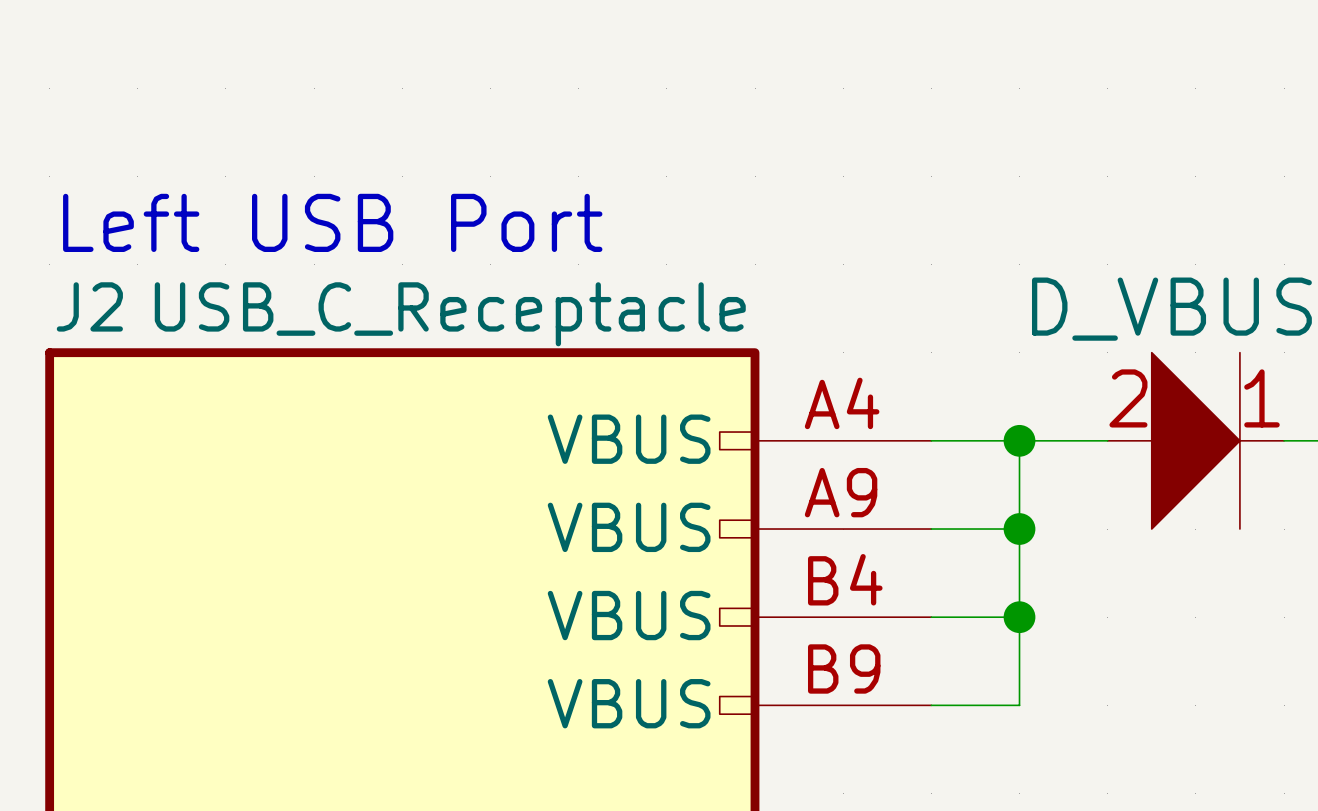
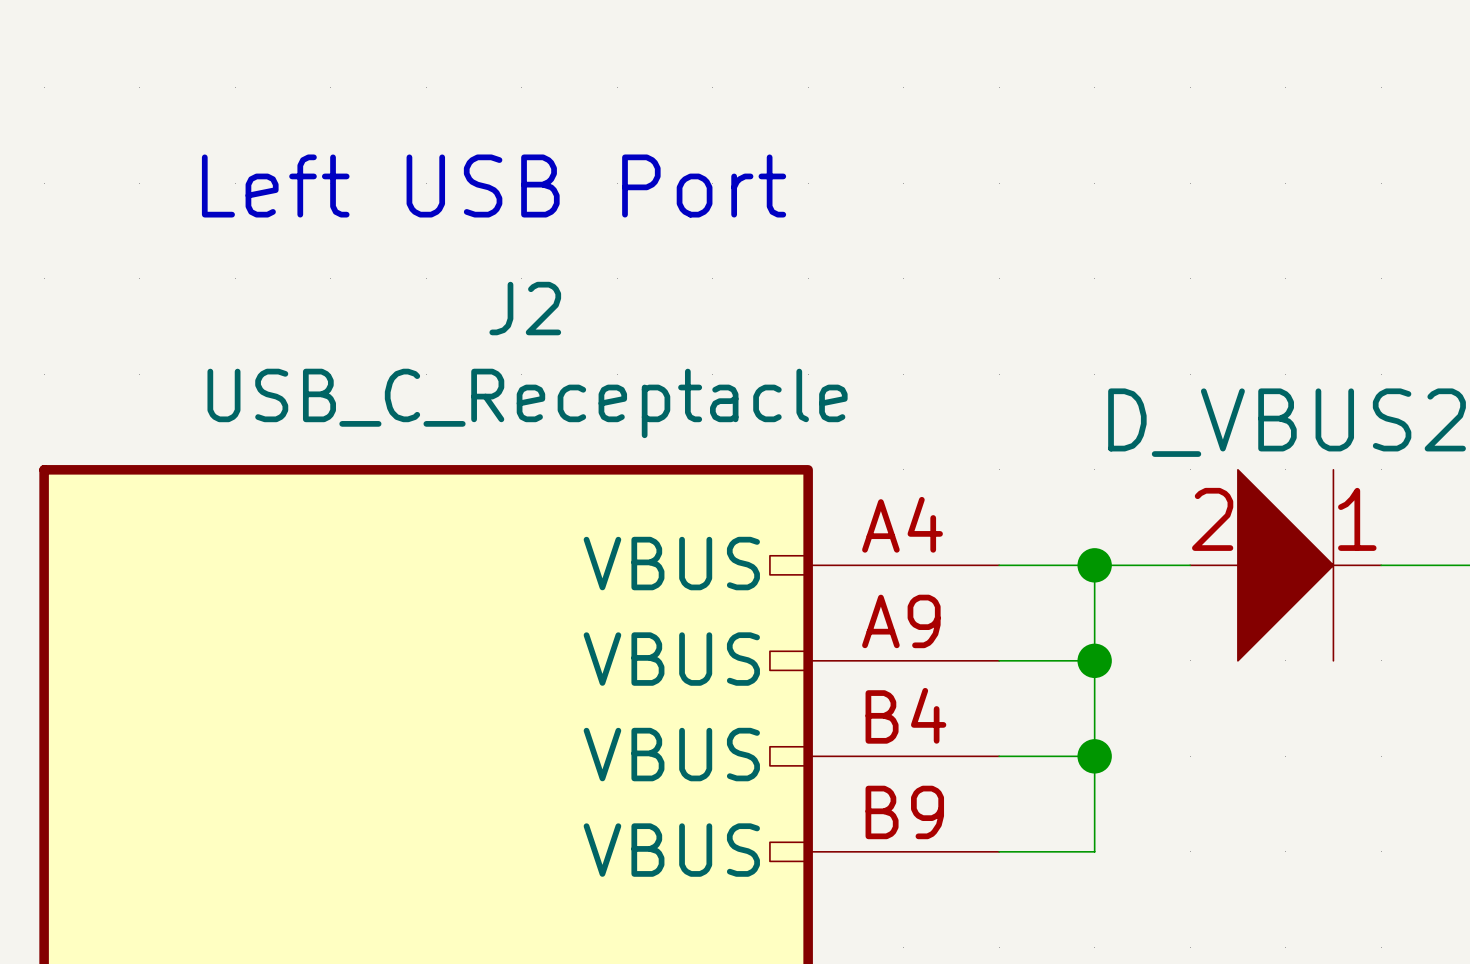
text position: Left USB Port (332, 222) -> Left USB Port (494, 186)
J2 name position: J2 (89, 306) -> J2 (525, 308)
J2 value position: USB_C_Receptacle (450, 314) -> USB_C_Receptacle (527, 403)

